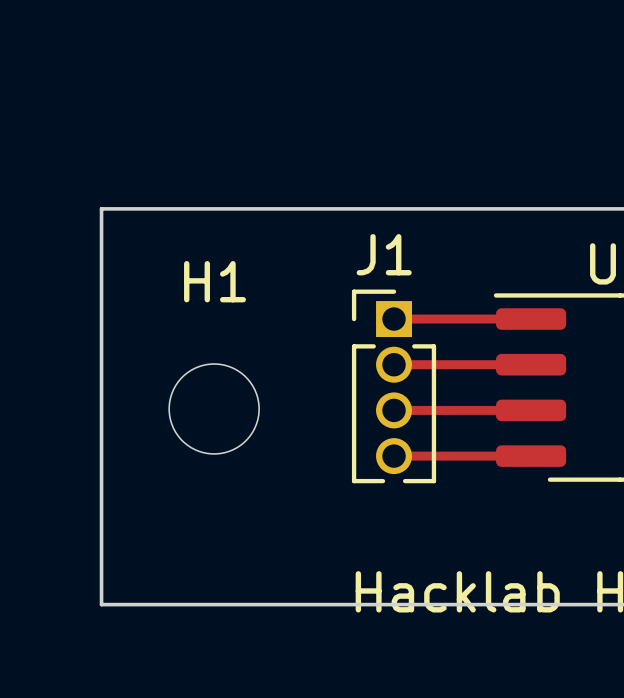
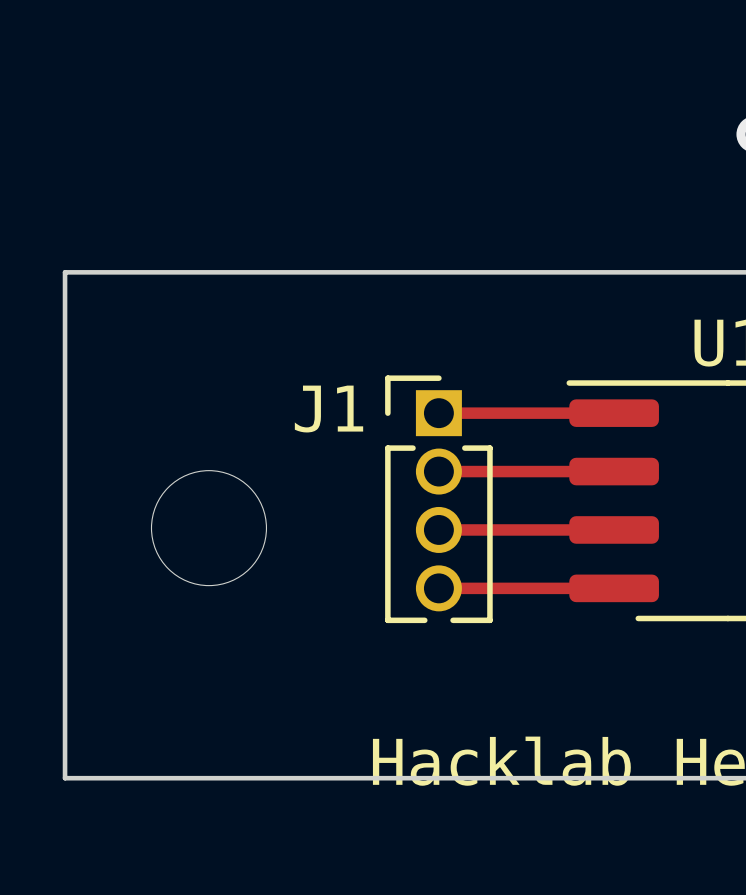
J1 name position: J1 (384, 254) -> J1 (329, 409)
H1 name: H1 (215, 281) -> none

